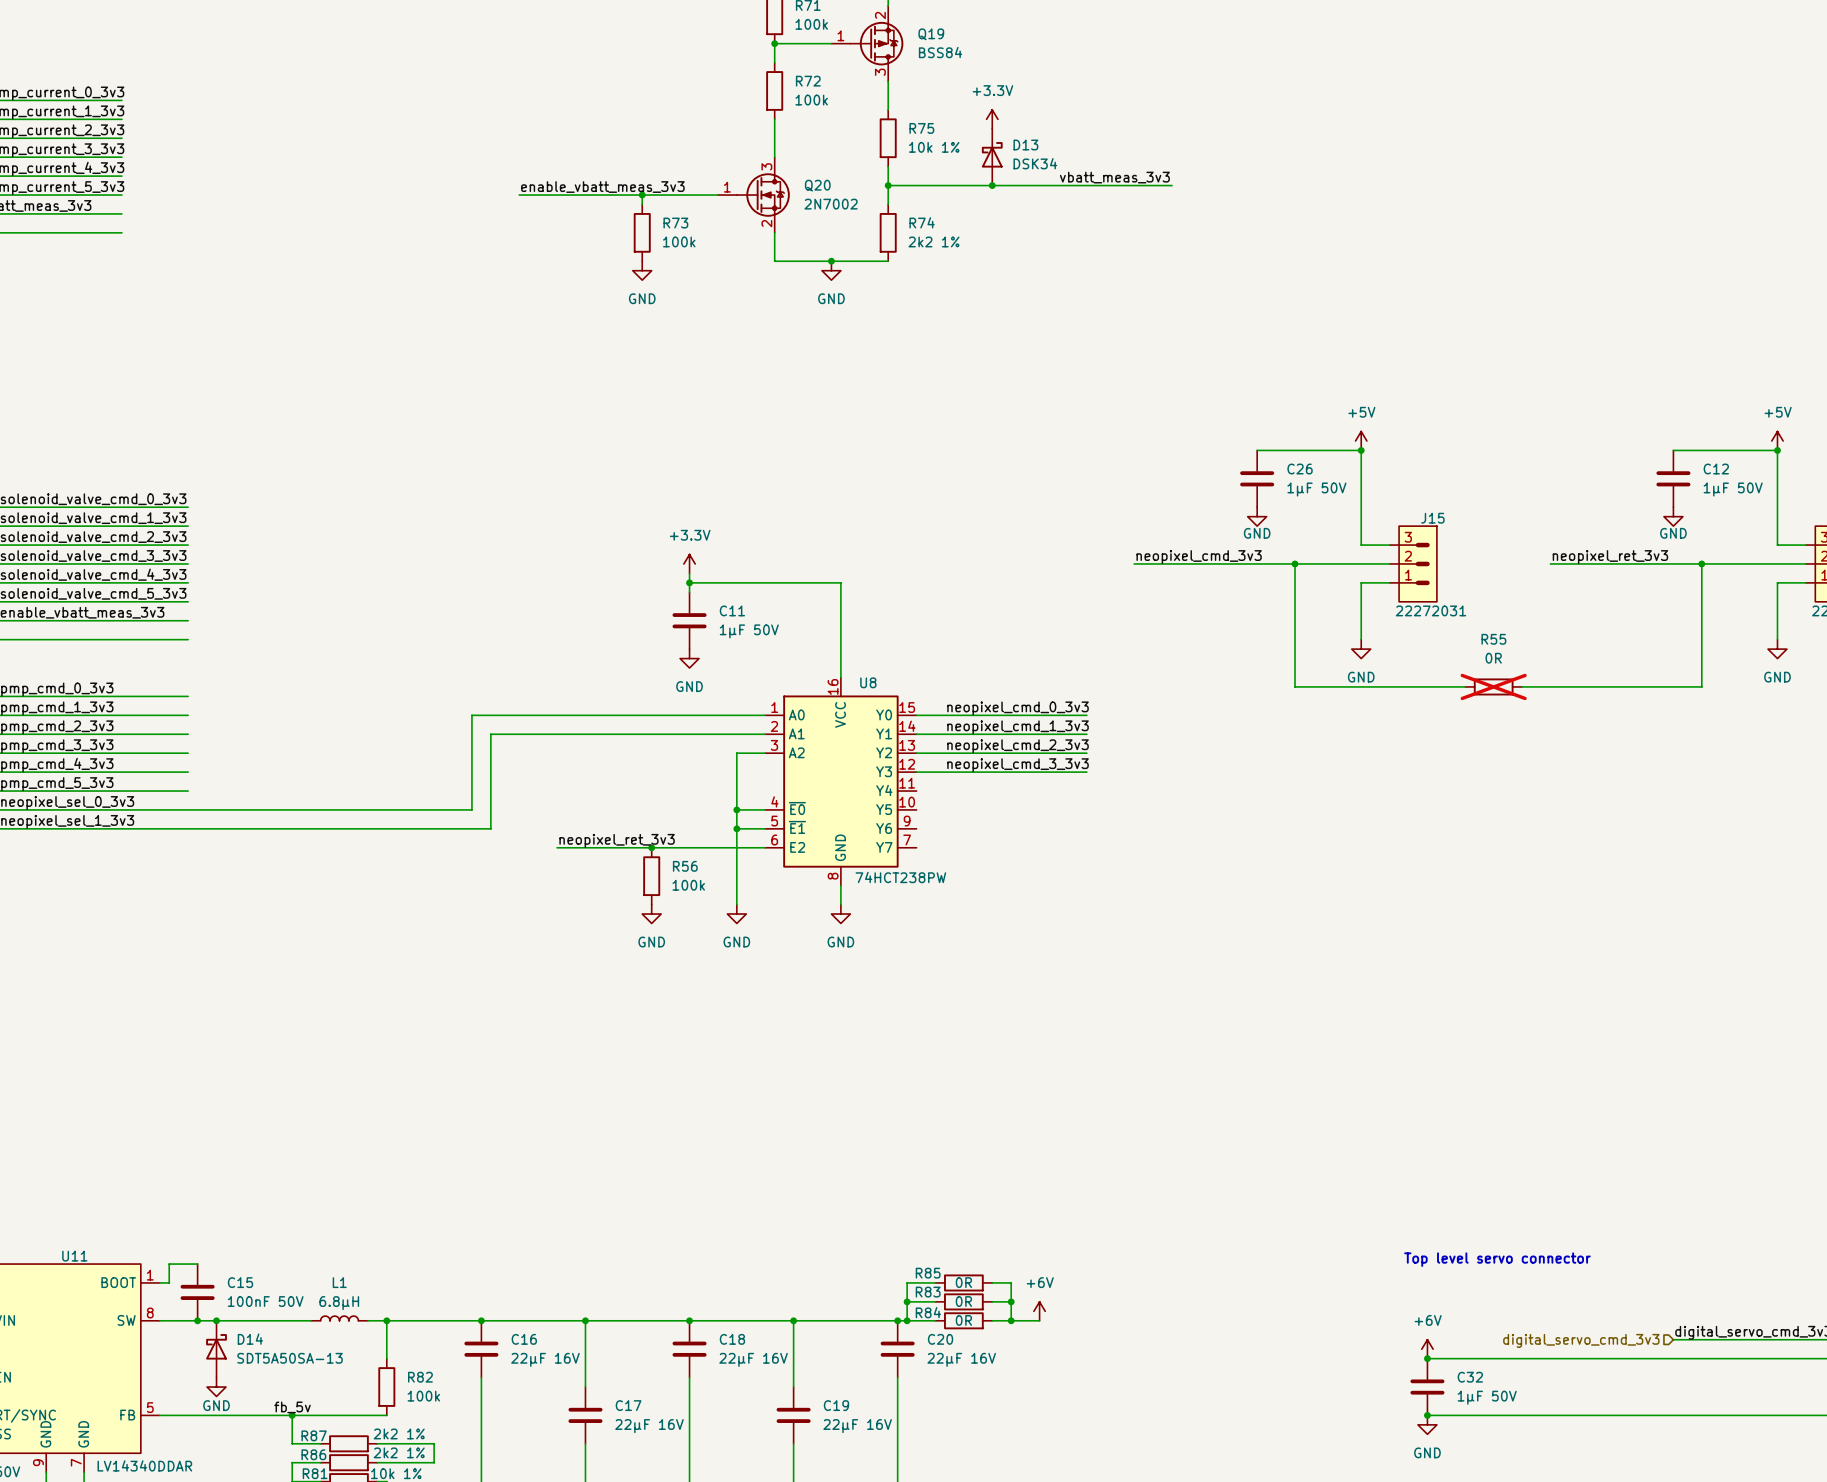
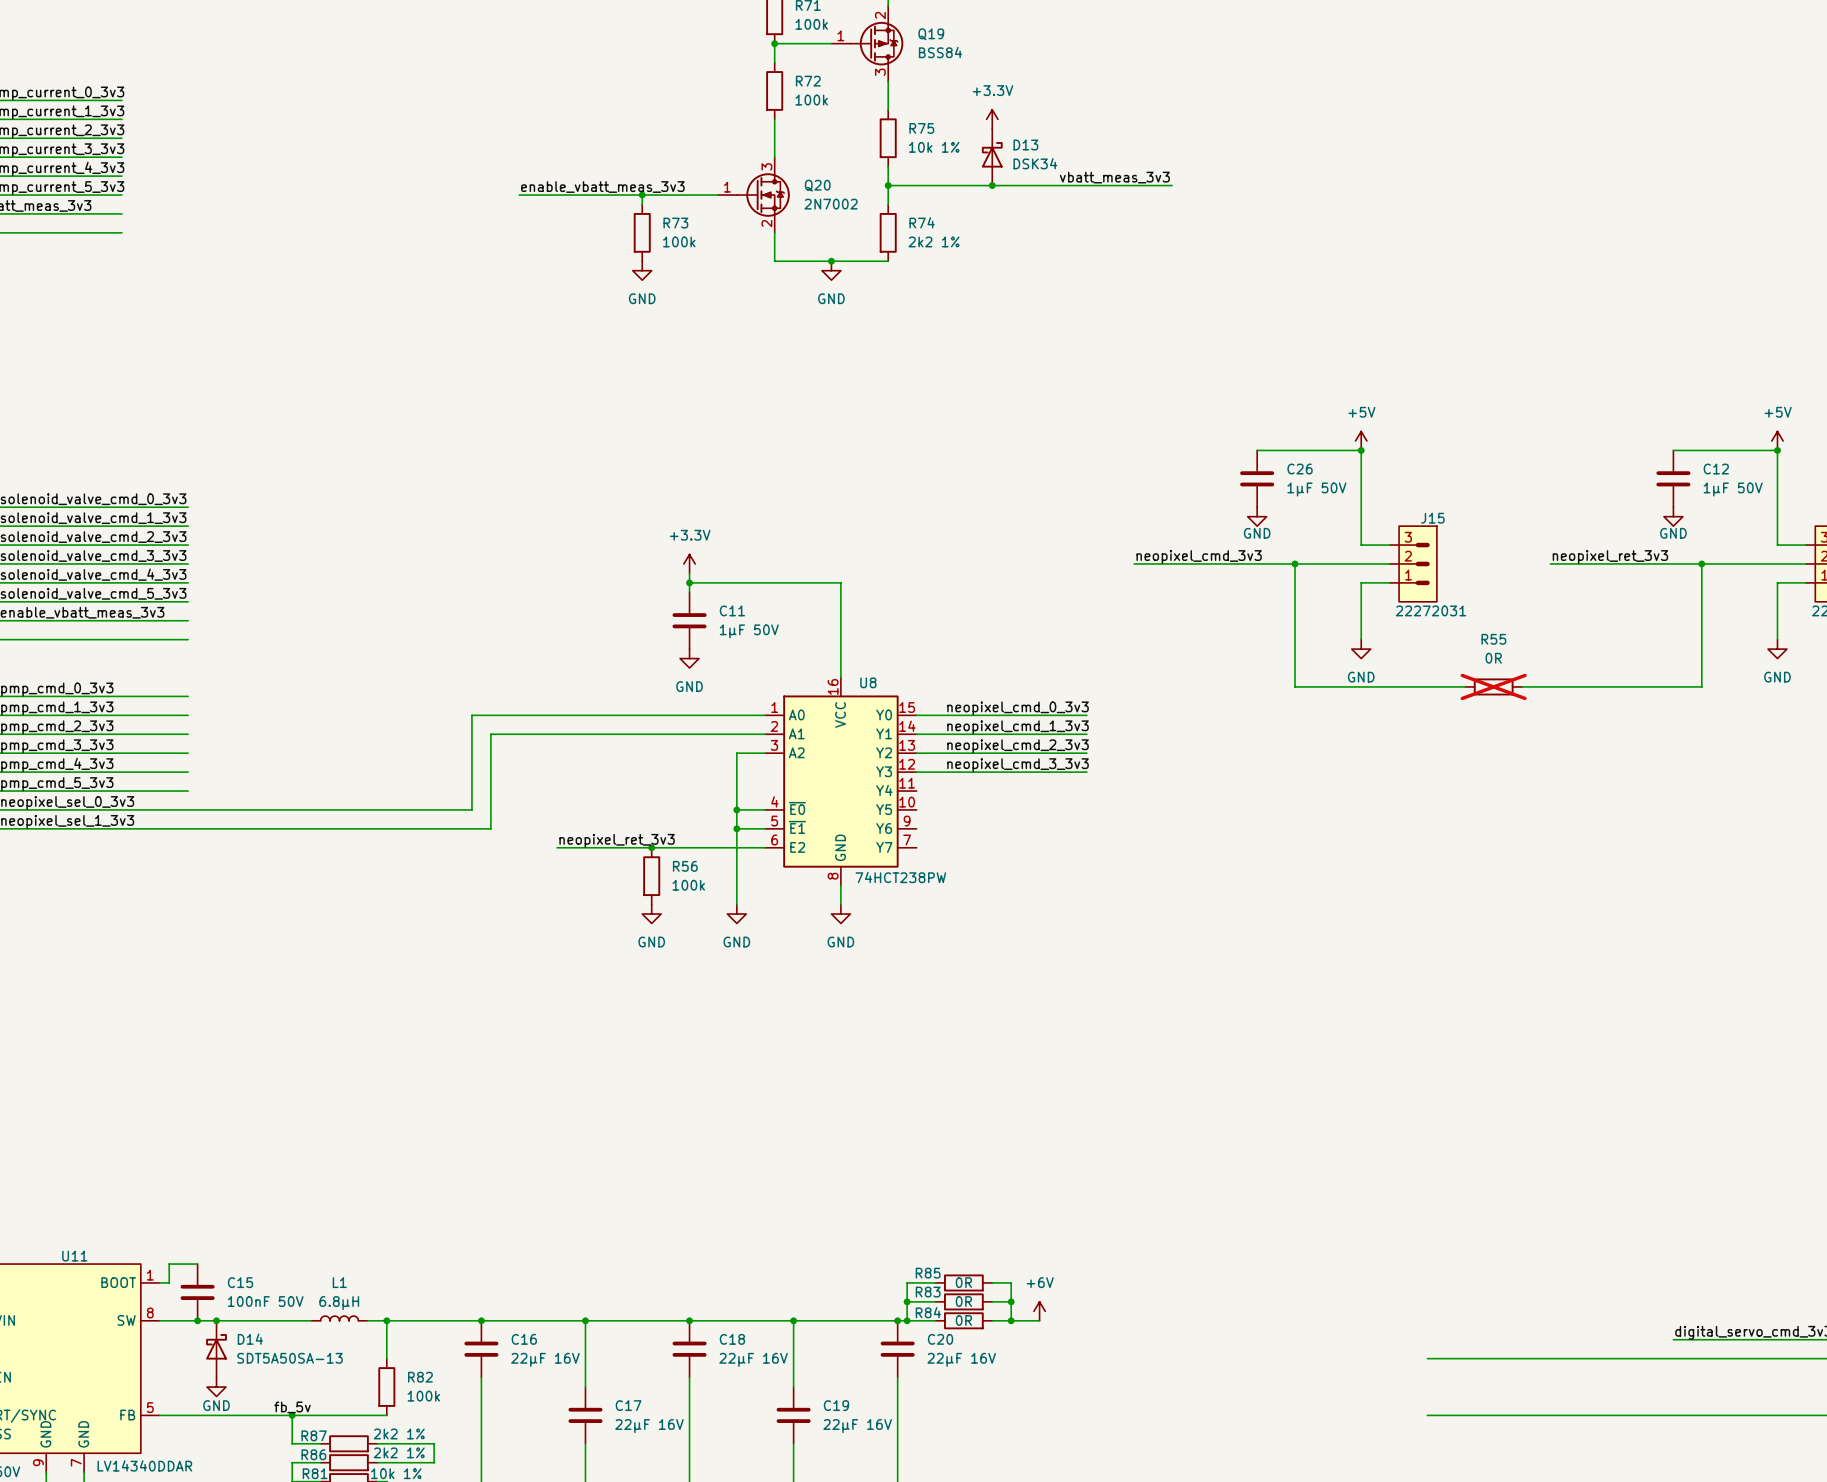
text: Top level servo connector (1497, 1259) -> none
hierarchical label: digital_servo_cmd_3v3 (1581, 1340) -> none
power symbol: +6V (1427, 1349) -> none
junction: (1427, 1358) -> none
C32: 1µF 50V (1427, 1387) -> none
junction: (1427, 1415) -> none
power symbol: GND (1427, 1424) -> none

